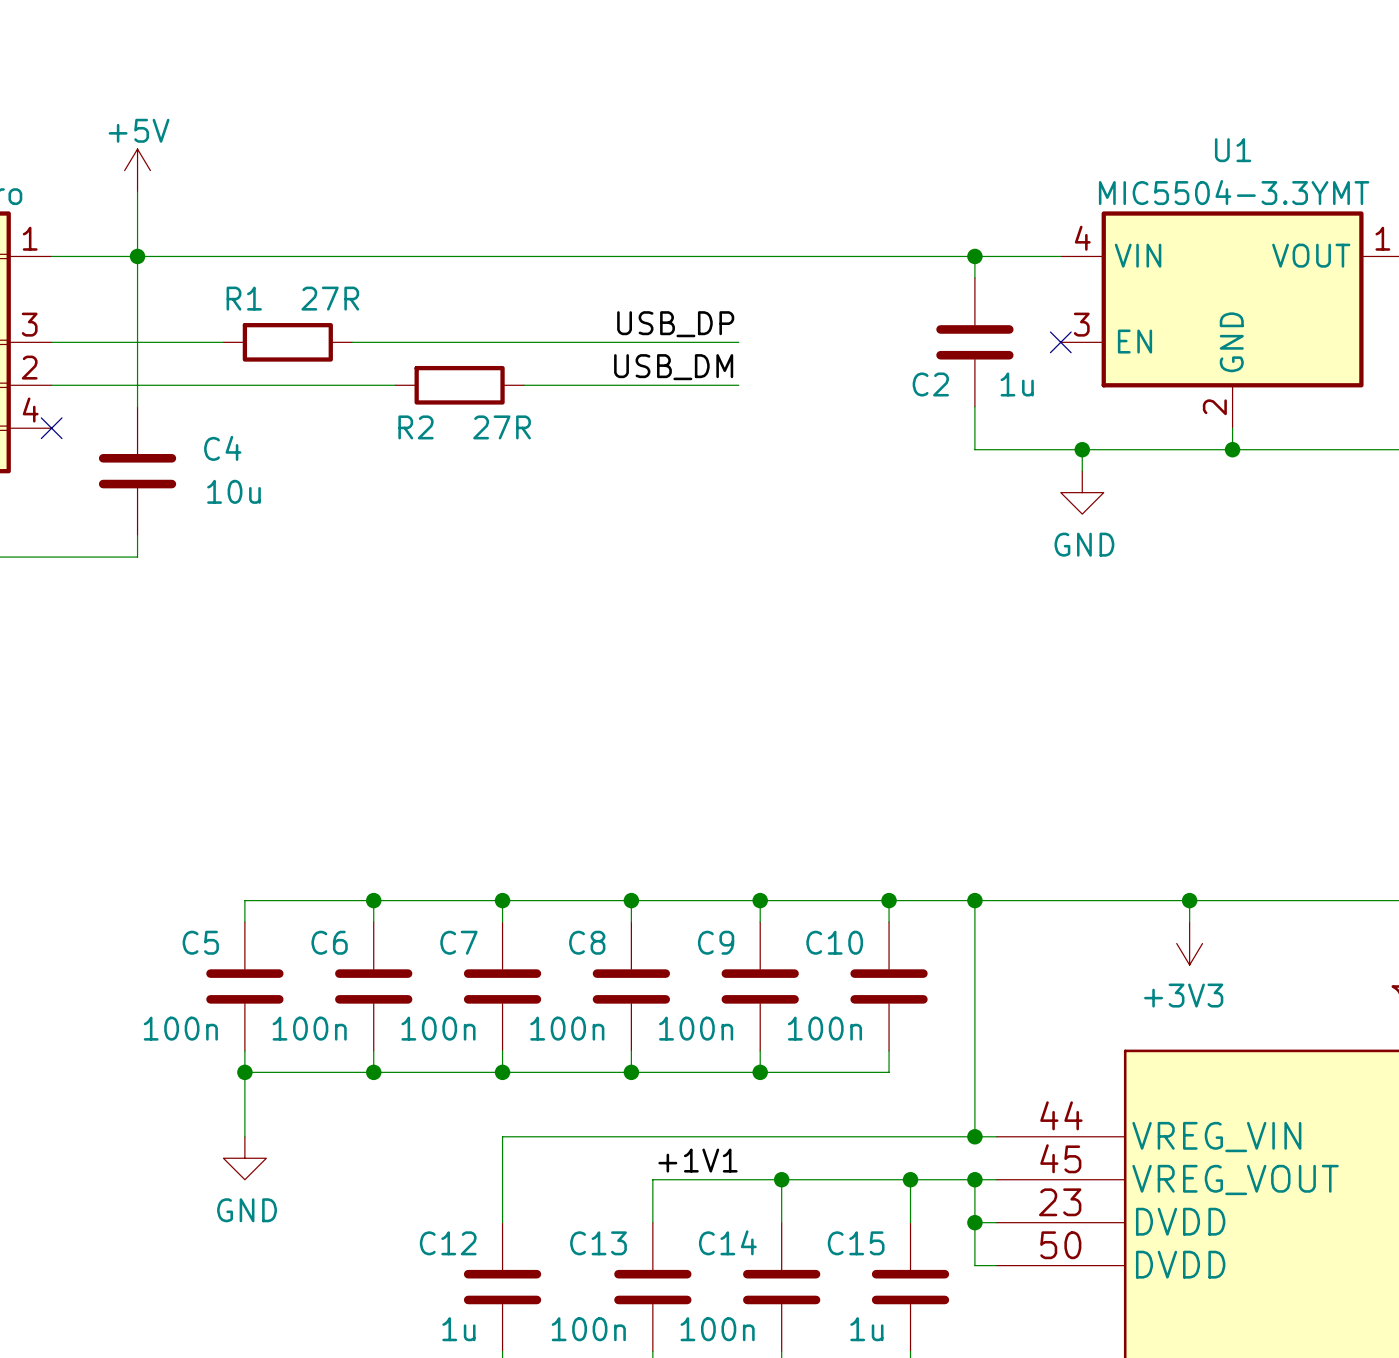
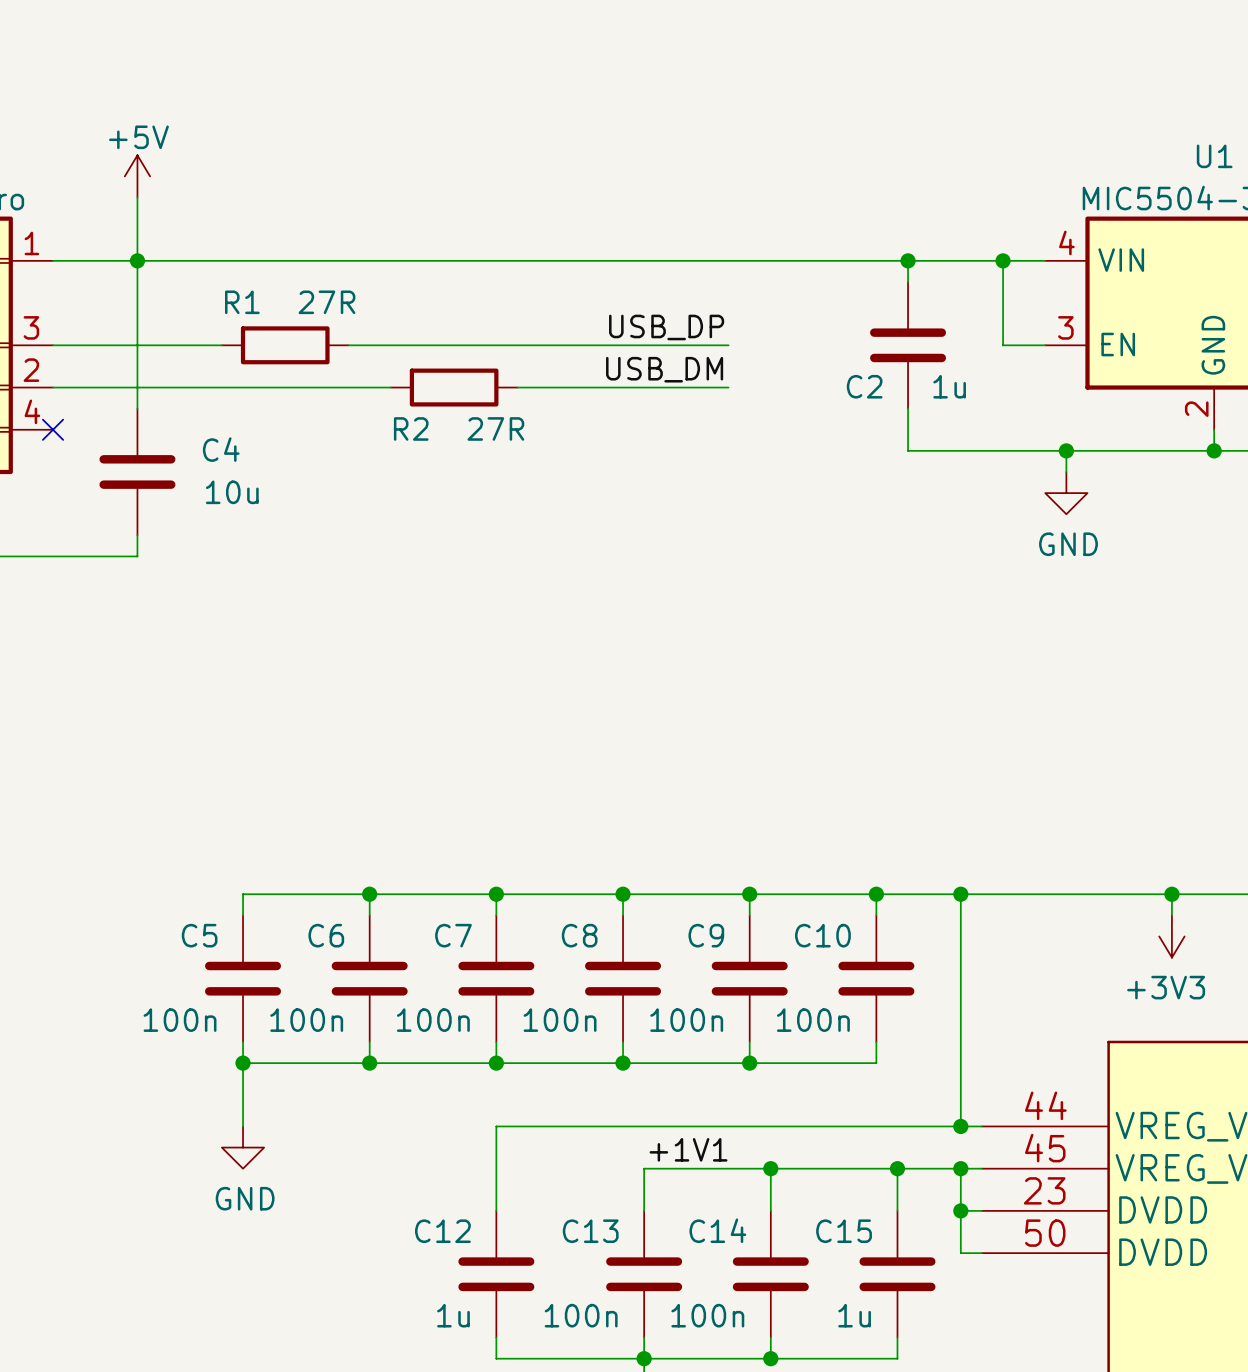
junction: none -> (908, 260)
wire: (974, 256) (974, 277) -> (908, 260) (908, 281)
junction: (974, 256) -> none
wire: none -> (1003, 260) (1003, 345) (1045, 345)
junction: none -> (1003, 260)
C2 position: (974, 342) -> (908, 345)
no-connect mark: (1060, 342) -> none
wire: (974, 406) (974, 449) -> (908, 408) (908, 450) (960, 450)

